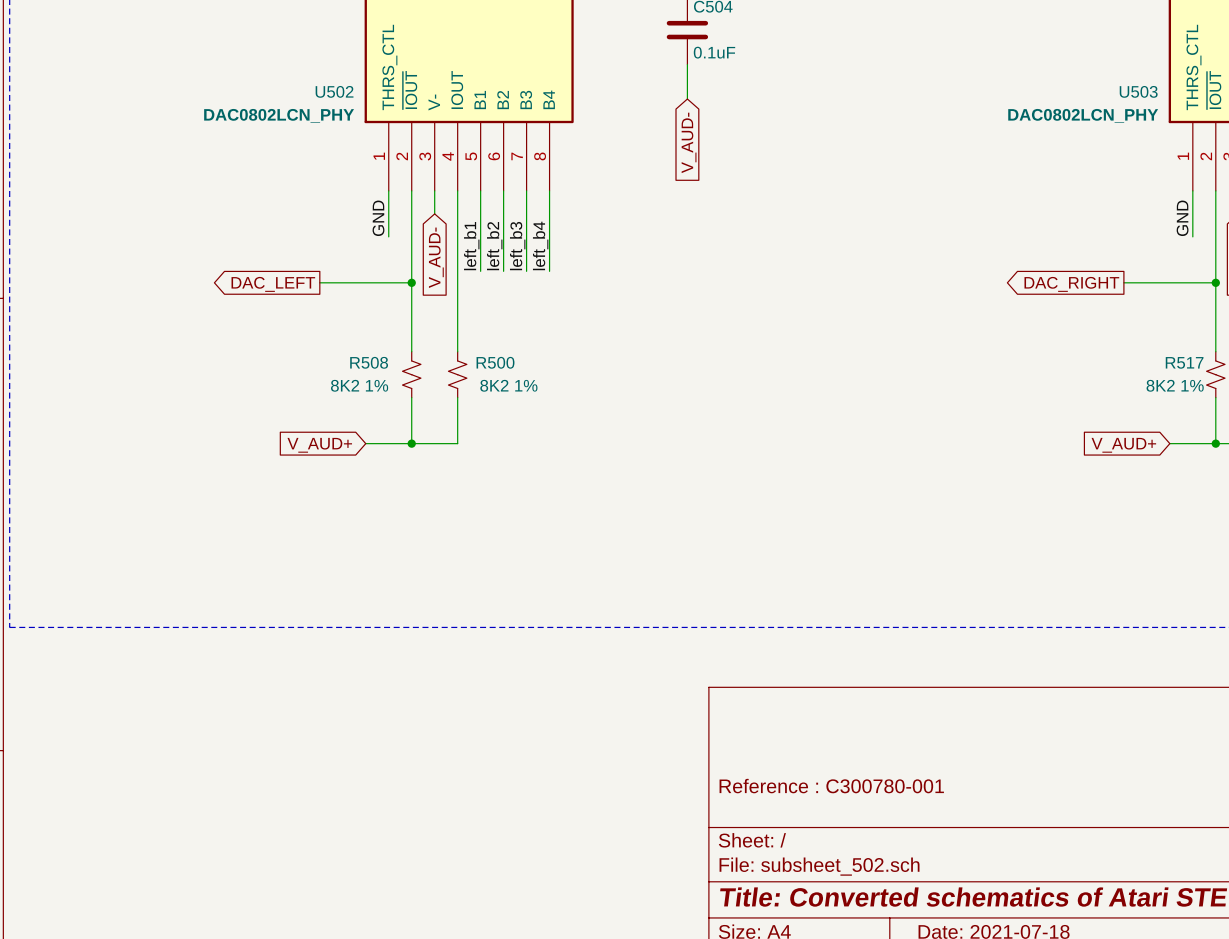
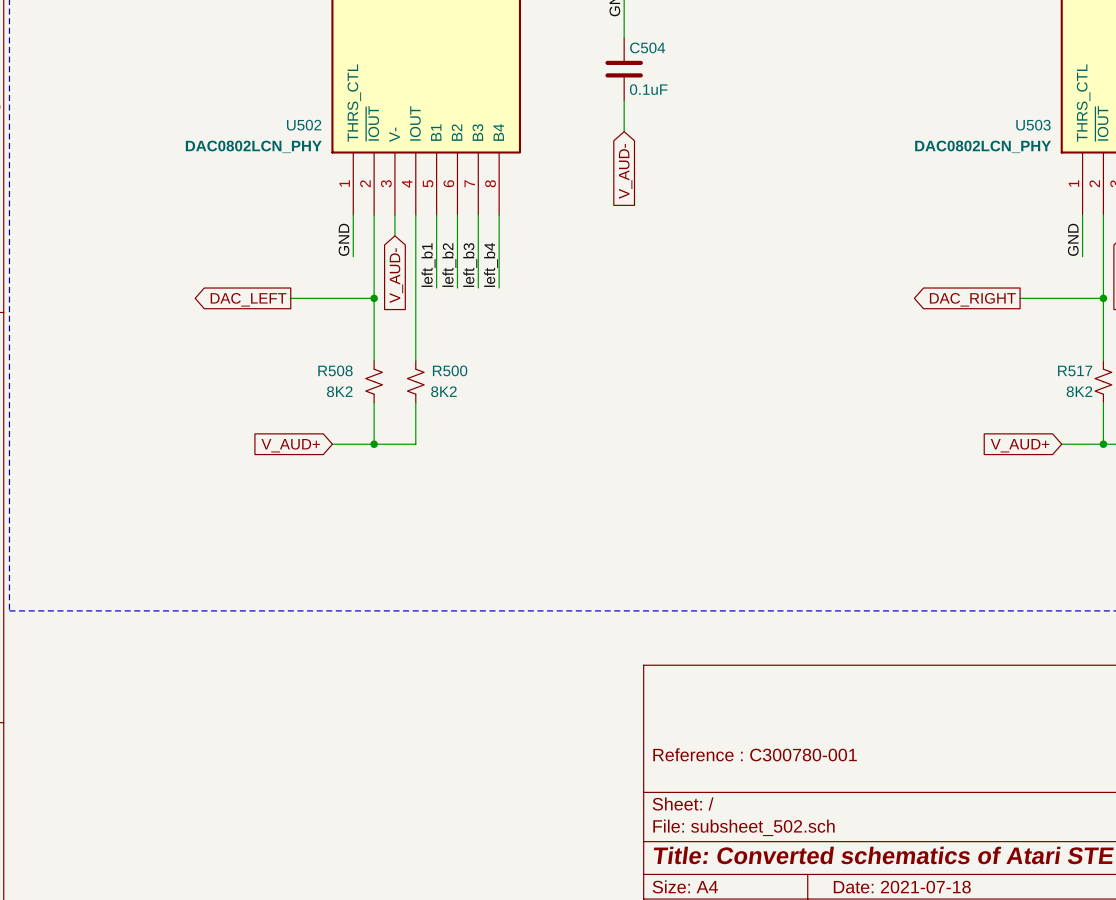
R508 value: 8K2 1% (359, 385) -> 8K2 (339, 391)
R500 value: 8K2 1% (508, 385) -> 8K2 (443, 391)
R517 value: 8K2 1% (1175, 385) -> 8K2 (1079, 391)

